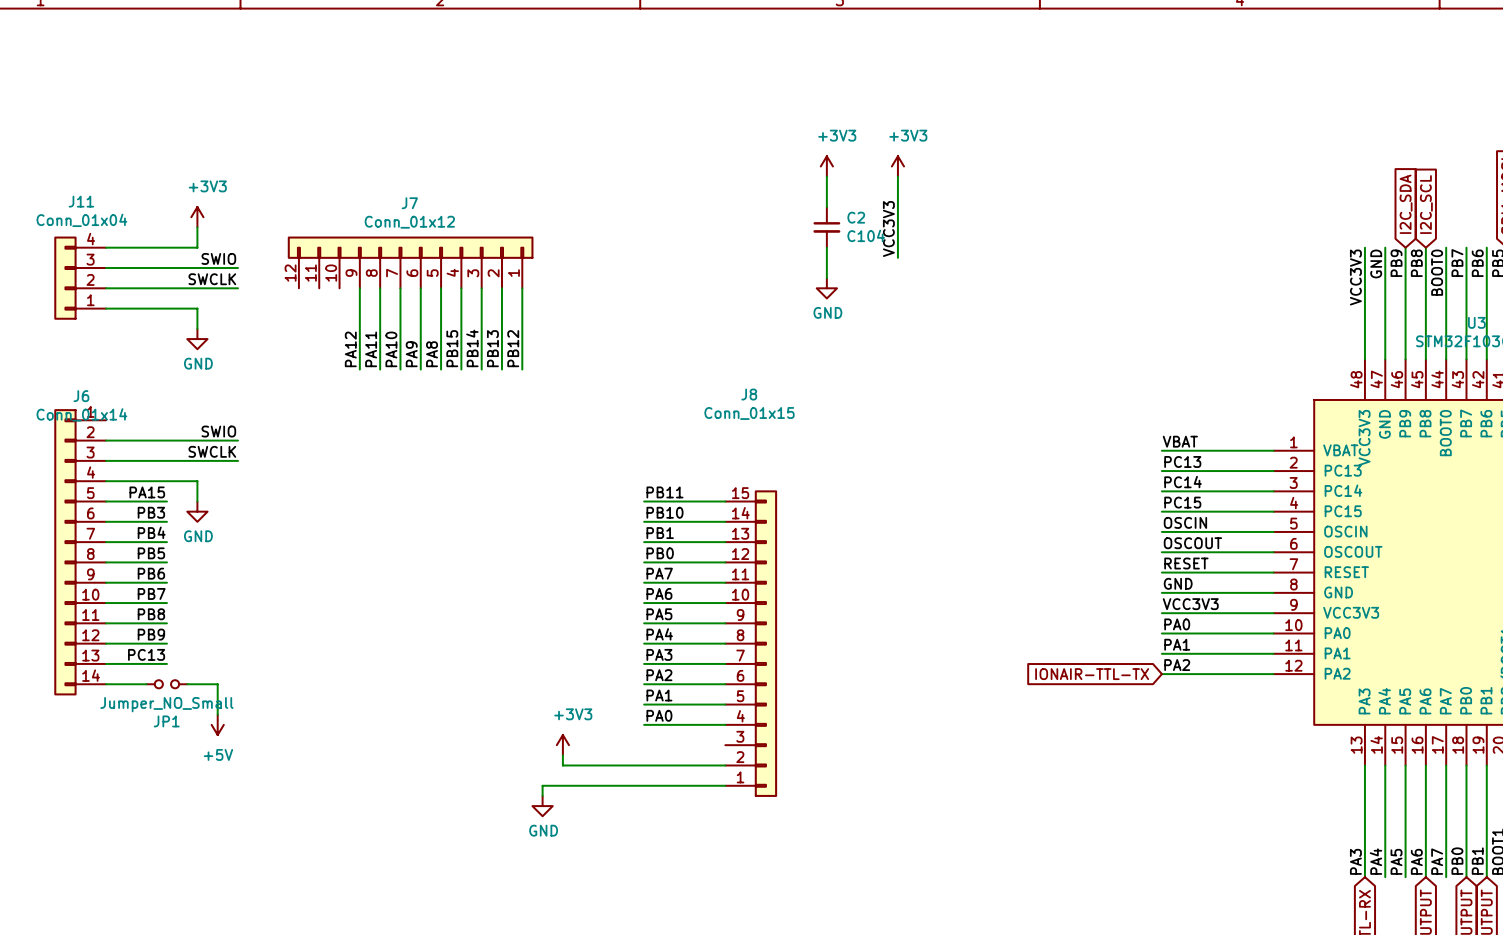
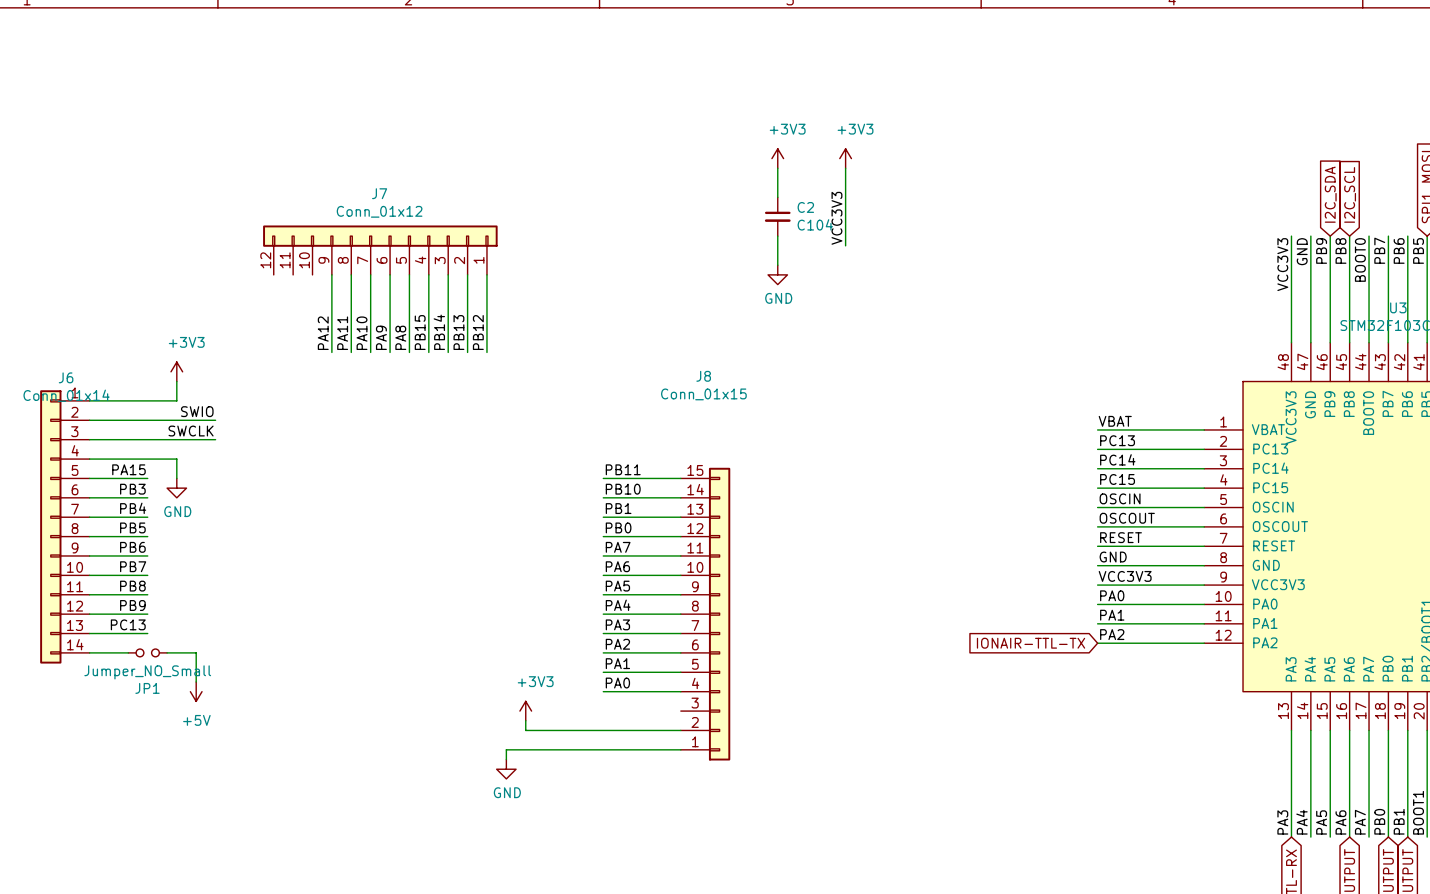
power symbol position: +3V3 (197, 217) -> +3V3 (176, 371)
wire: (197, 227) (197, 247) (106, 247) -> (176, 381) (176, 400) (89, 400)
label: SWIO (218, 258) -> none
wire: (106, 267) (238, 267) -> none
J11: Conn_01x04 (80, 278) -> none
label: SWCLK (212, 279) -> none
wire: (106, 288) (238, 288) -> none
wire: (106, 308) (197, 308) (197, 328) -> none
power symbol: GND (197, 339) -> none

